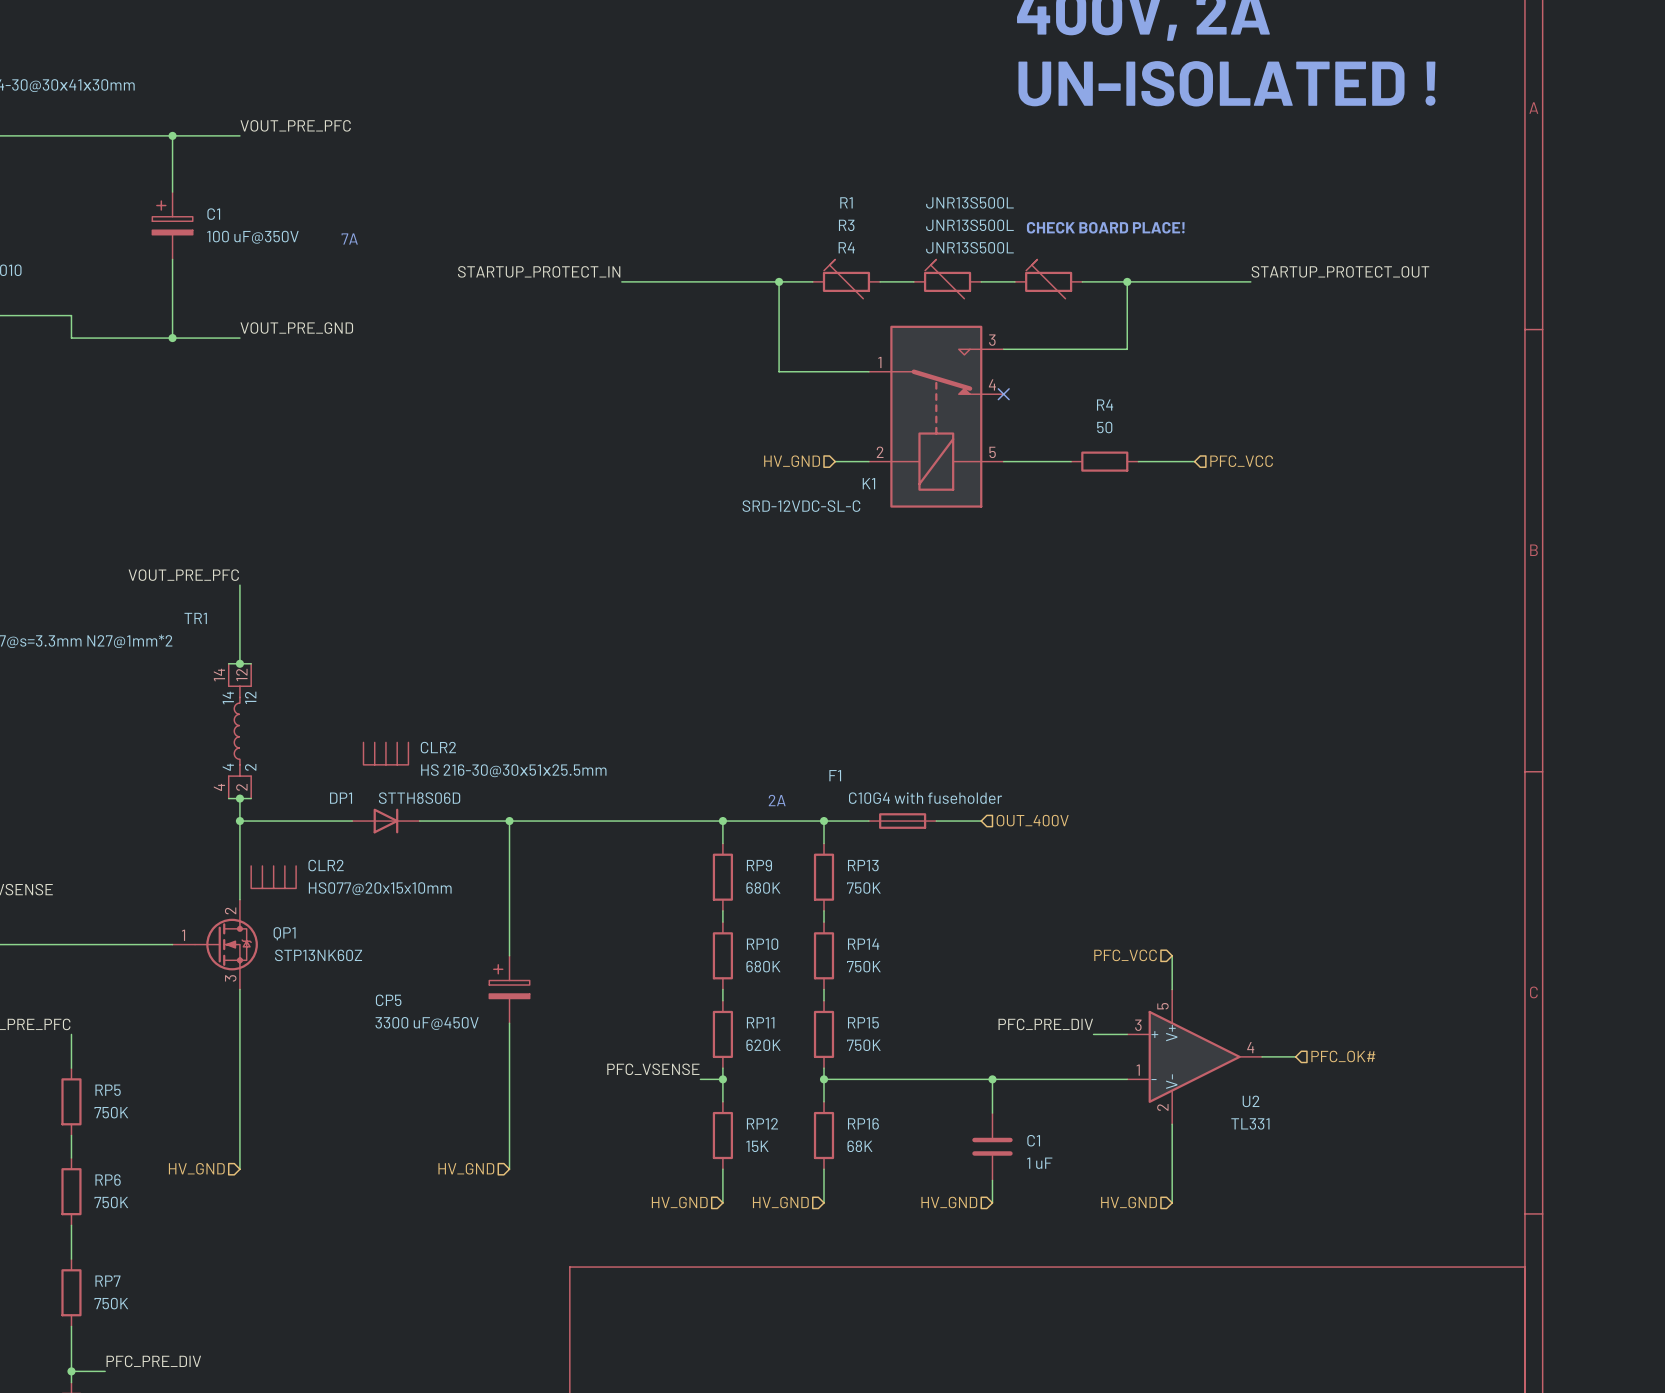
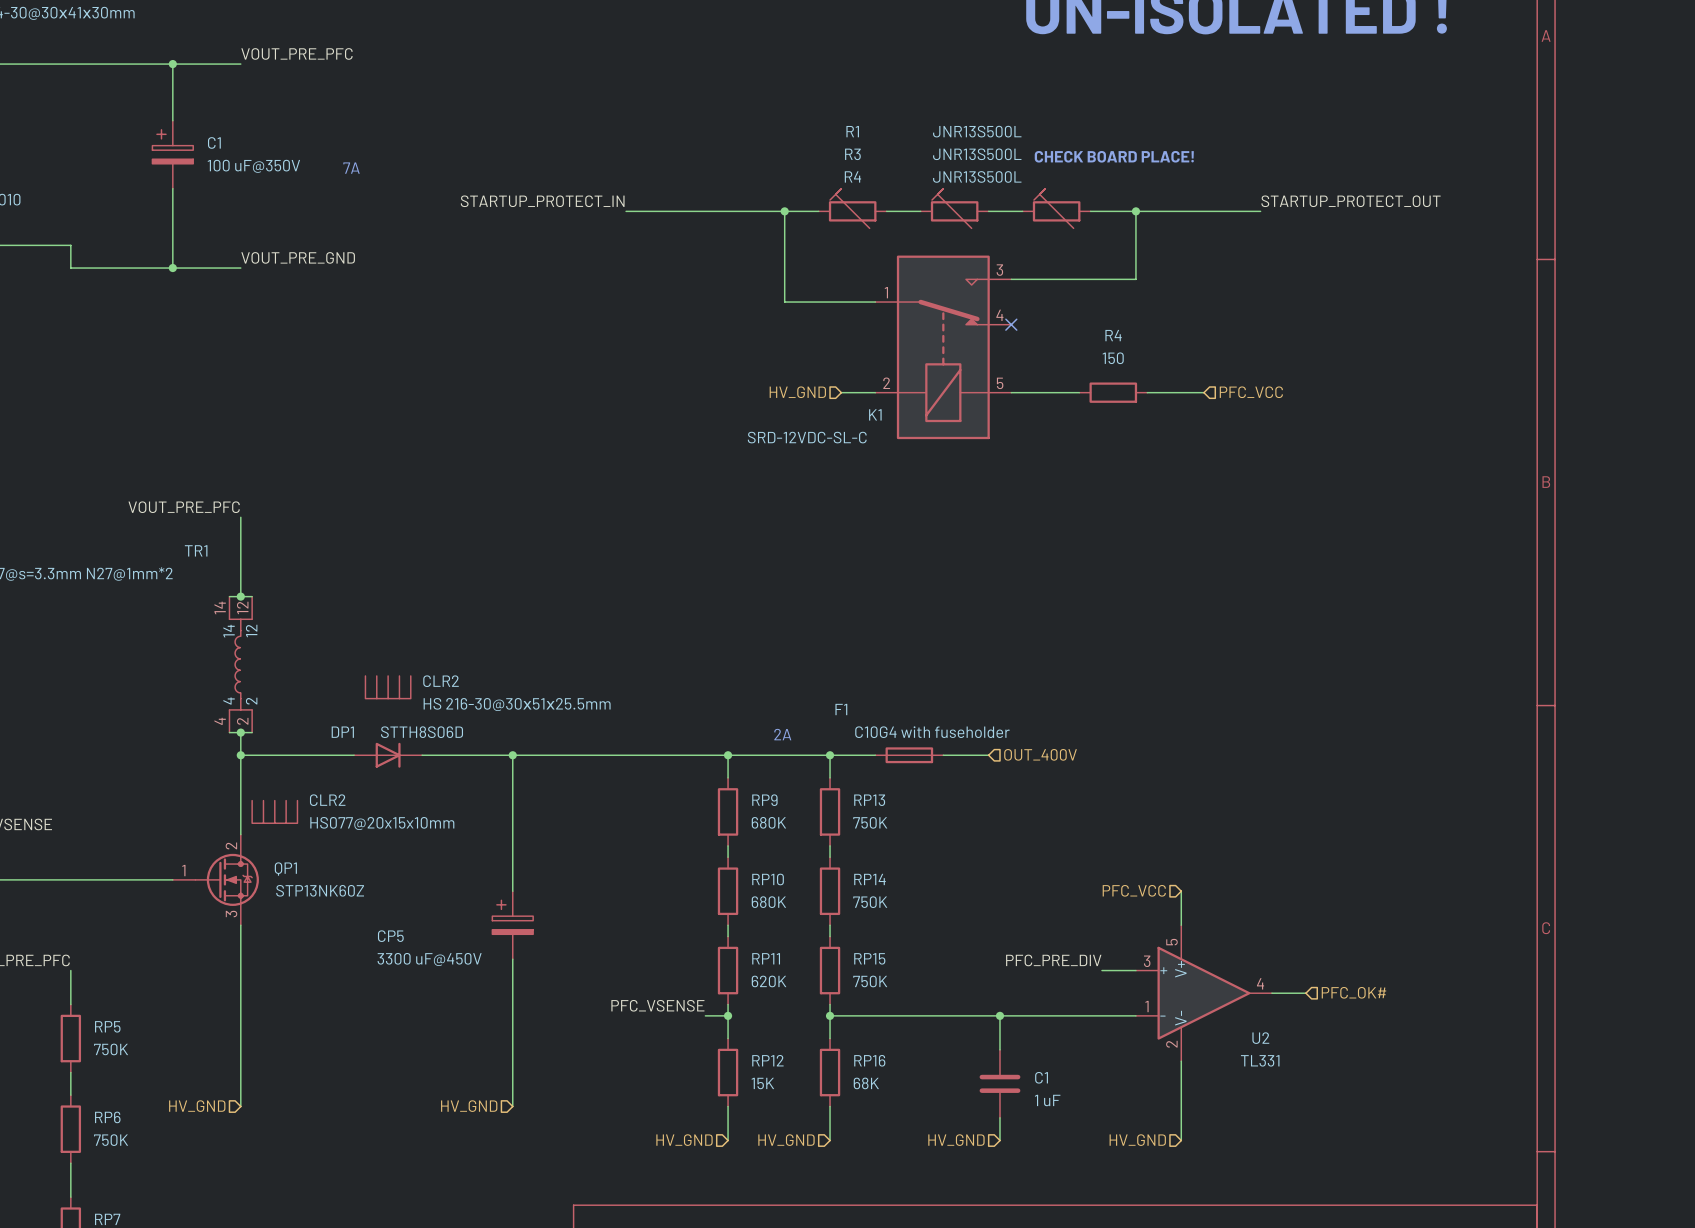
R4 value: 50 (1104, 427) -> 150 (1113, 358)

